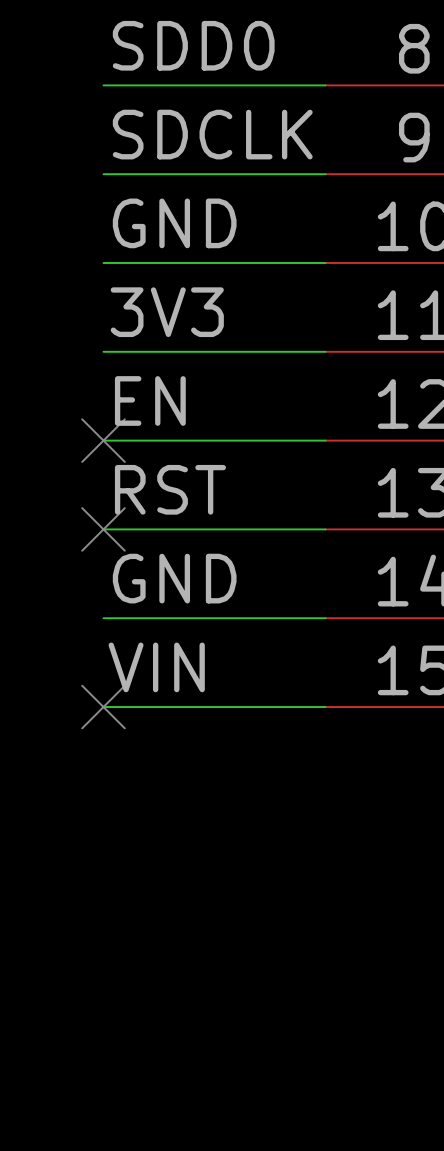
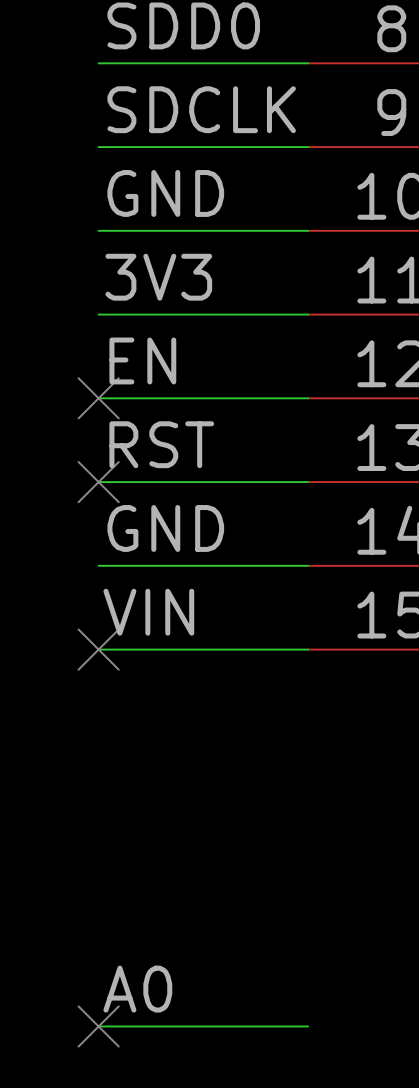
label: none -> A0 (137, 989)
wire: none -> (98, 1026) (308, 1026)
no-connect mark: none -> (98, 1026)

